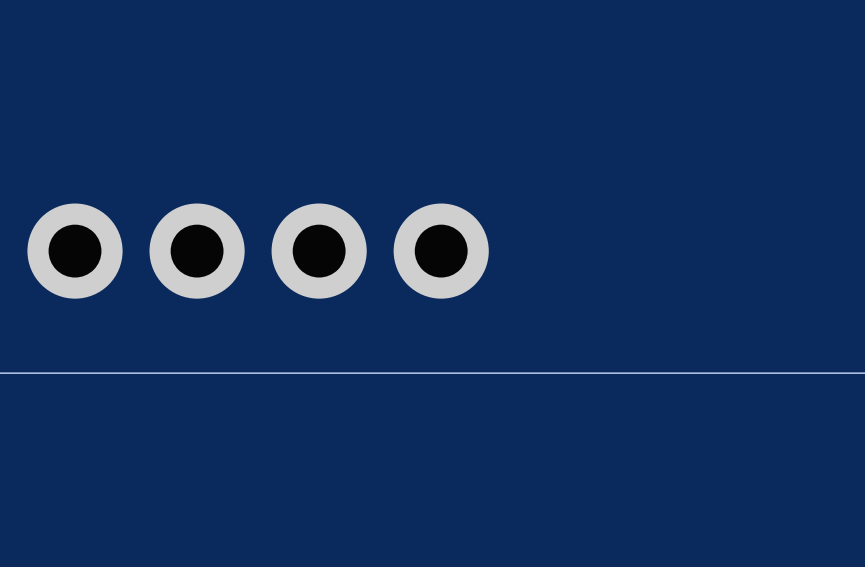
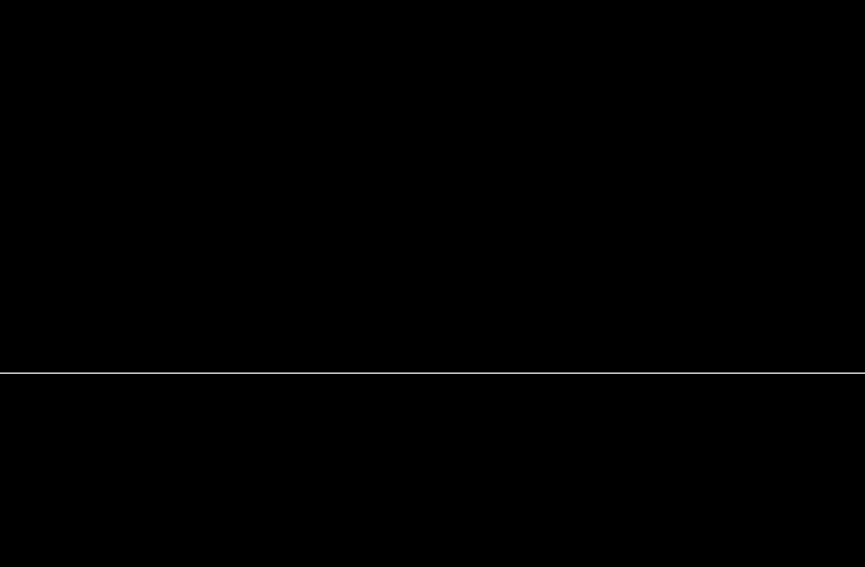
part: (258, 251) -> none

